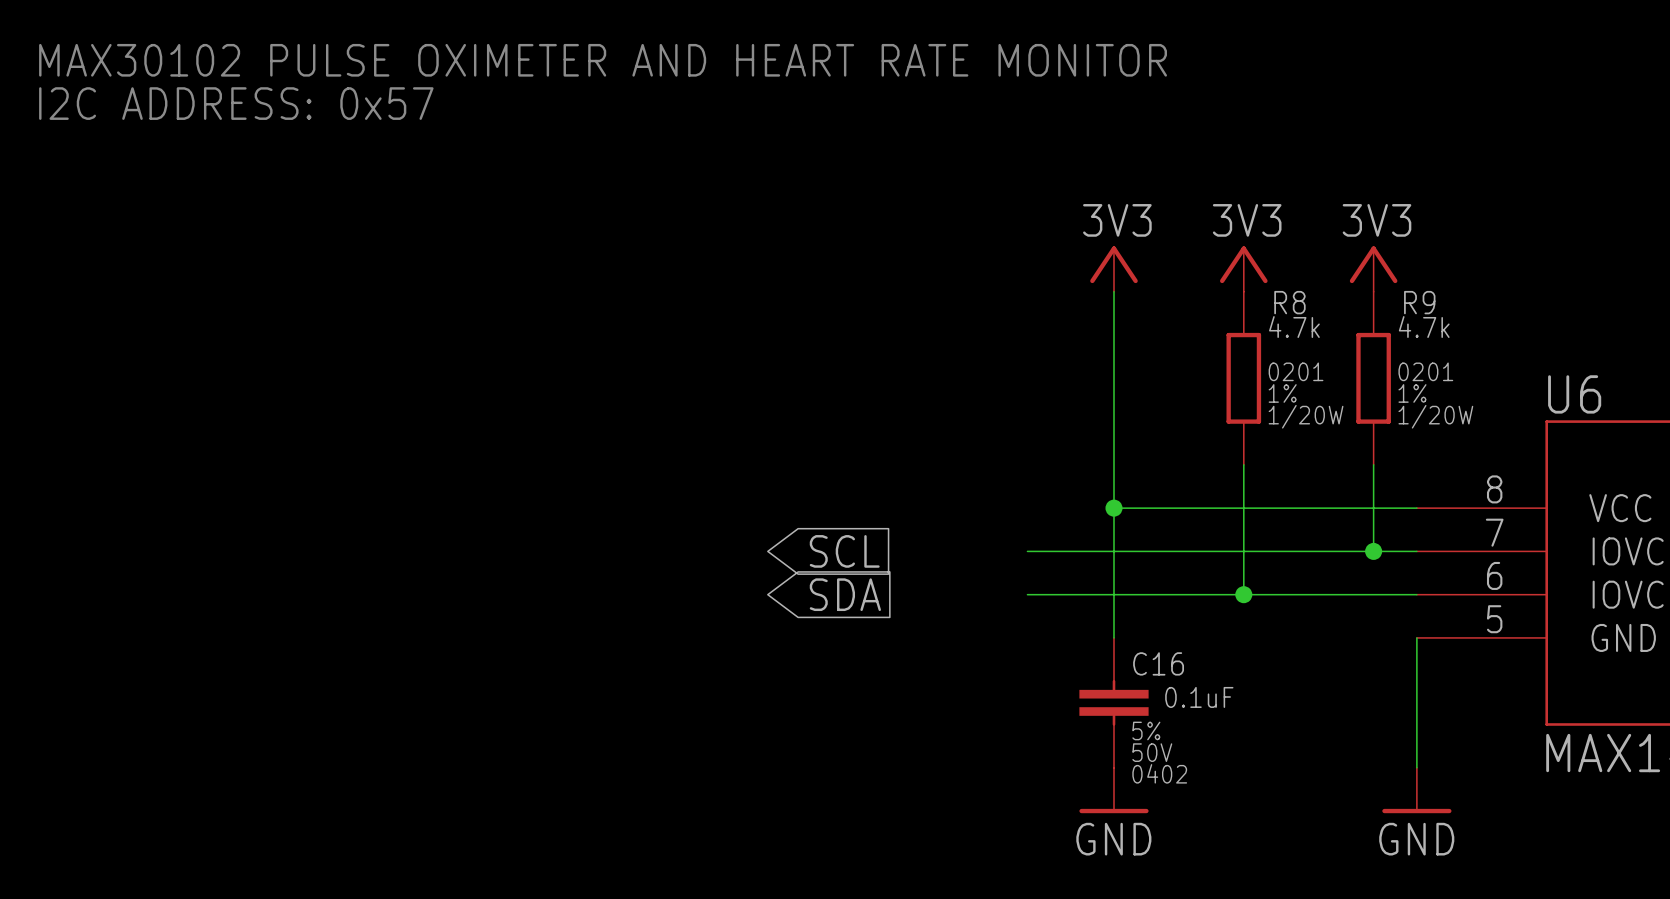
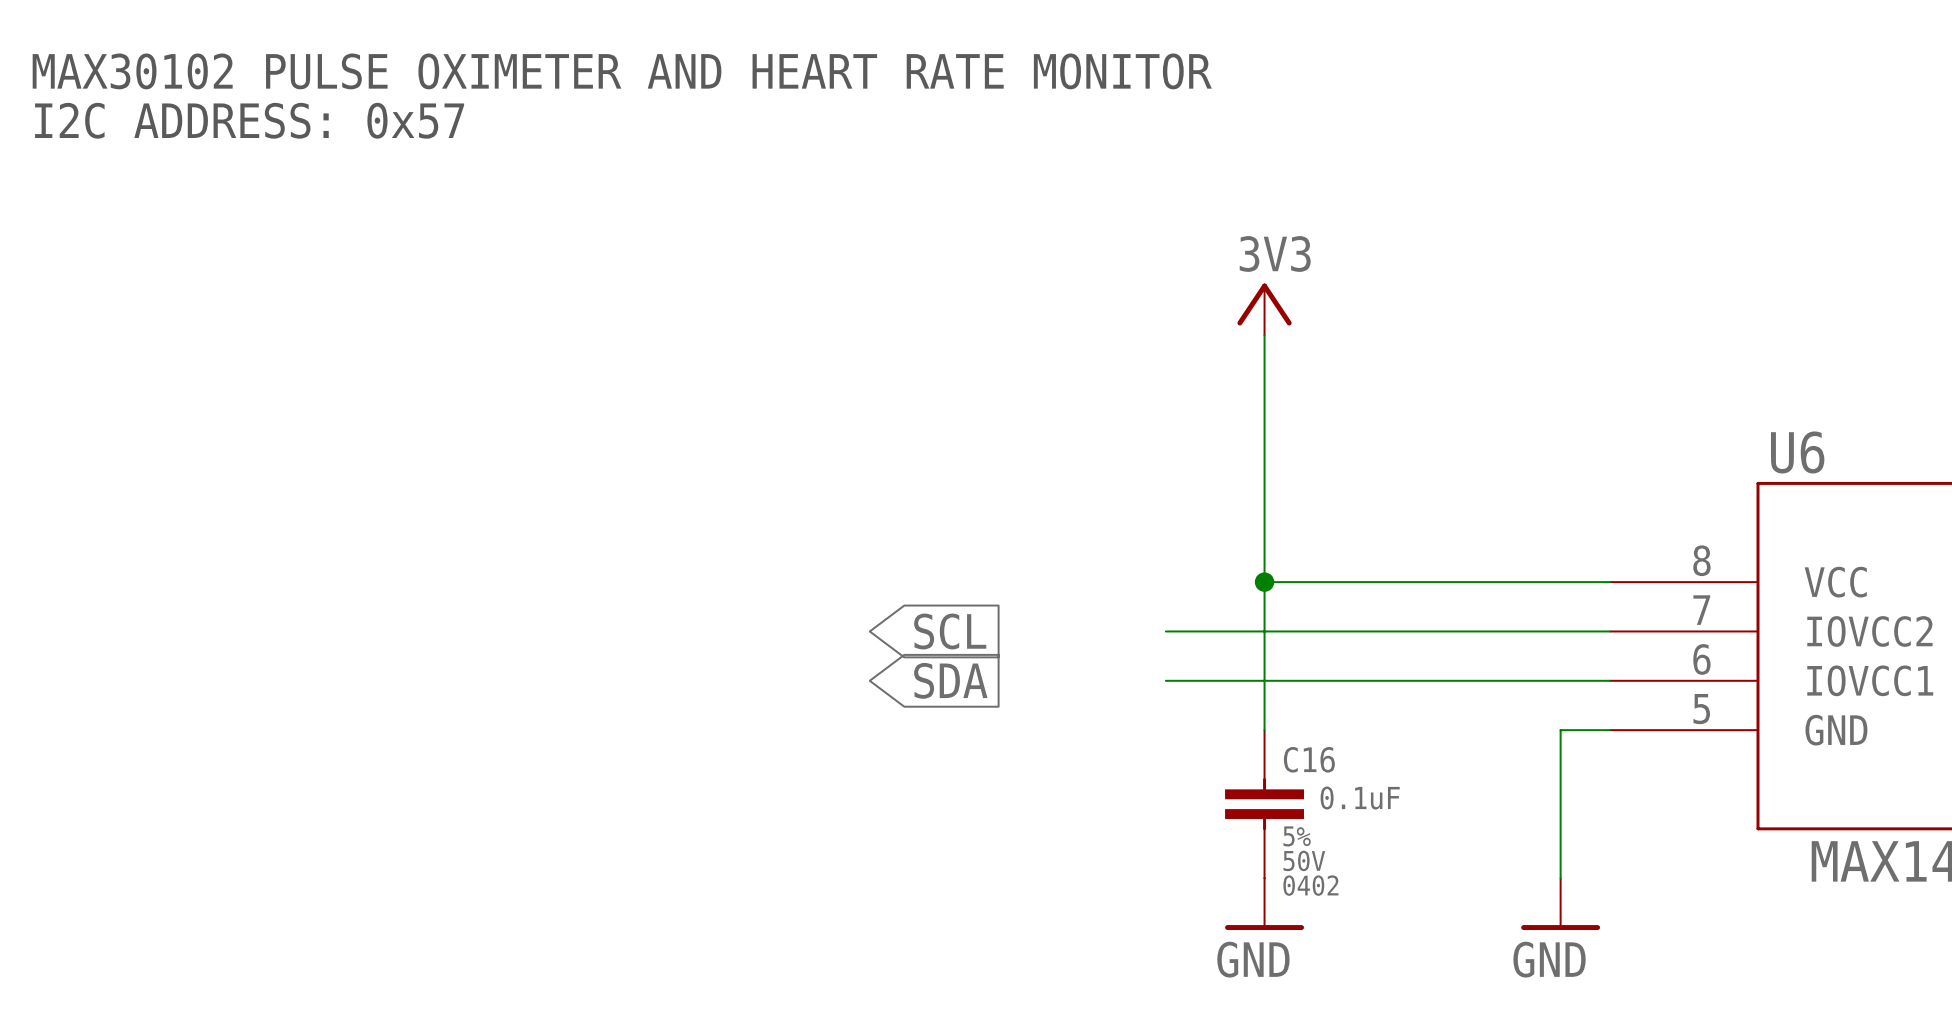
power symbol: 3V3 (1243, 269) -> none
power symbol: 3V3 (1373, 269) -> none
R8: 4.7k (1243, 378) -> none
R9: 4.7k (1373, 378) -> none
wire: (1243, 464) (1243, 594) -> none
wire: (1373, 464) (1373, 551) -> none
junction: (1373, 551) -> none
junction: (1243, 594) -> none
wire: (1416, 637) (1416, 767) -> (1609, 730) (1560, 730) (1560, 878)
power symbol position: GND (1416, 790) -> GND (1560, 904)

